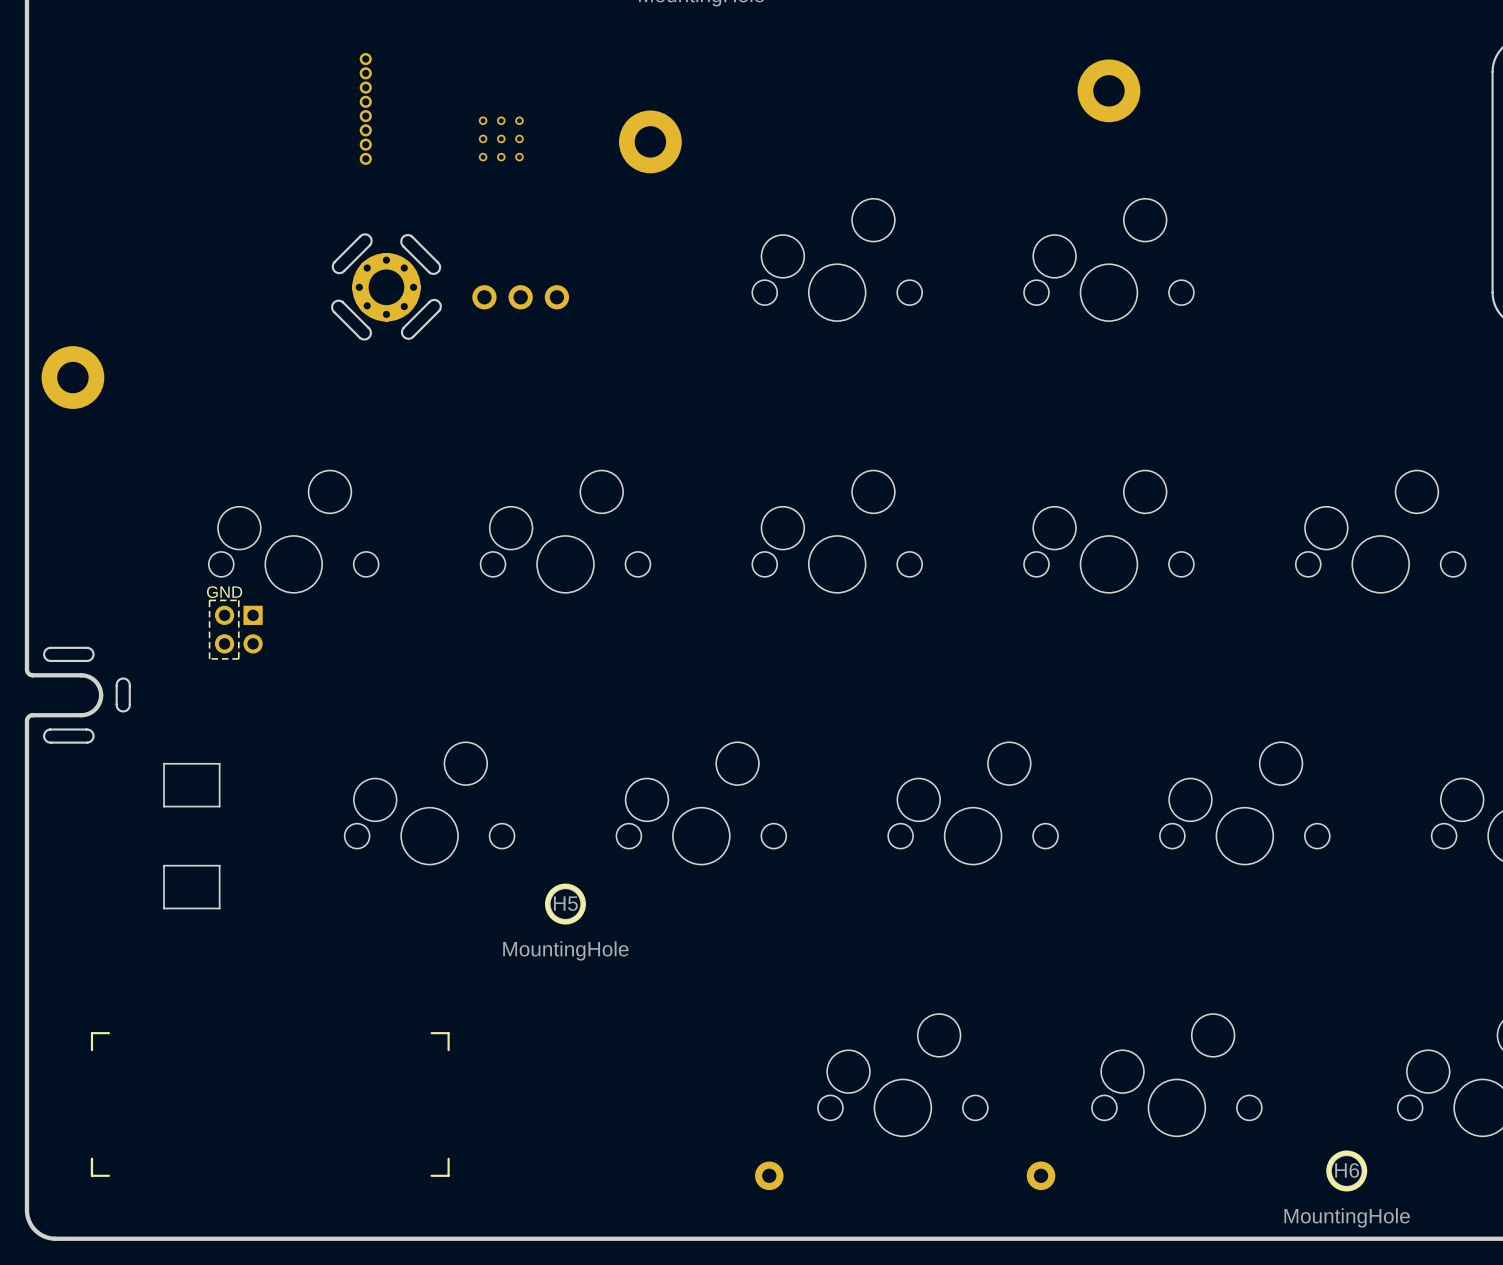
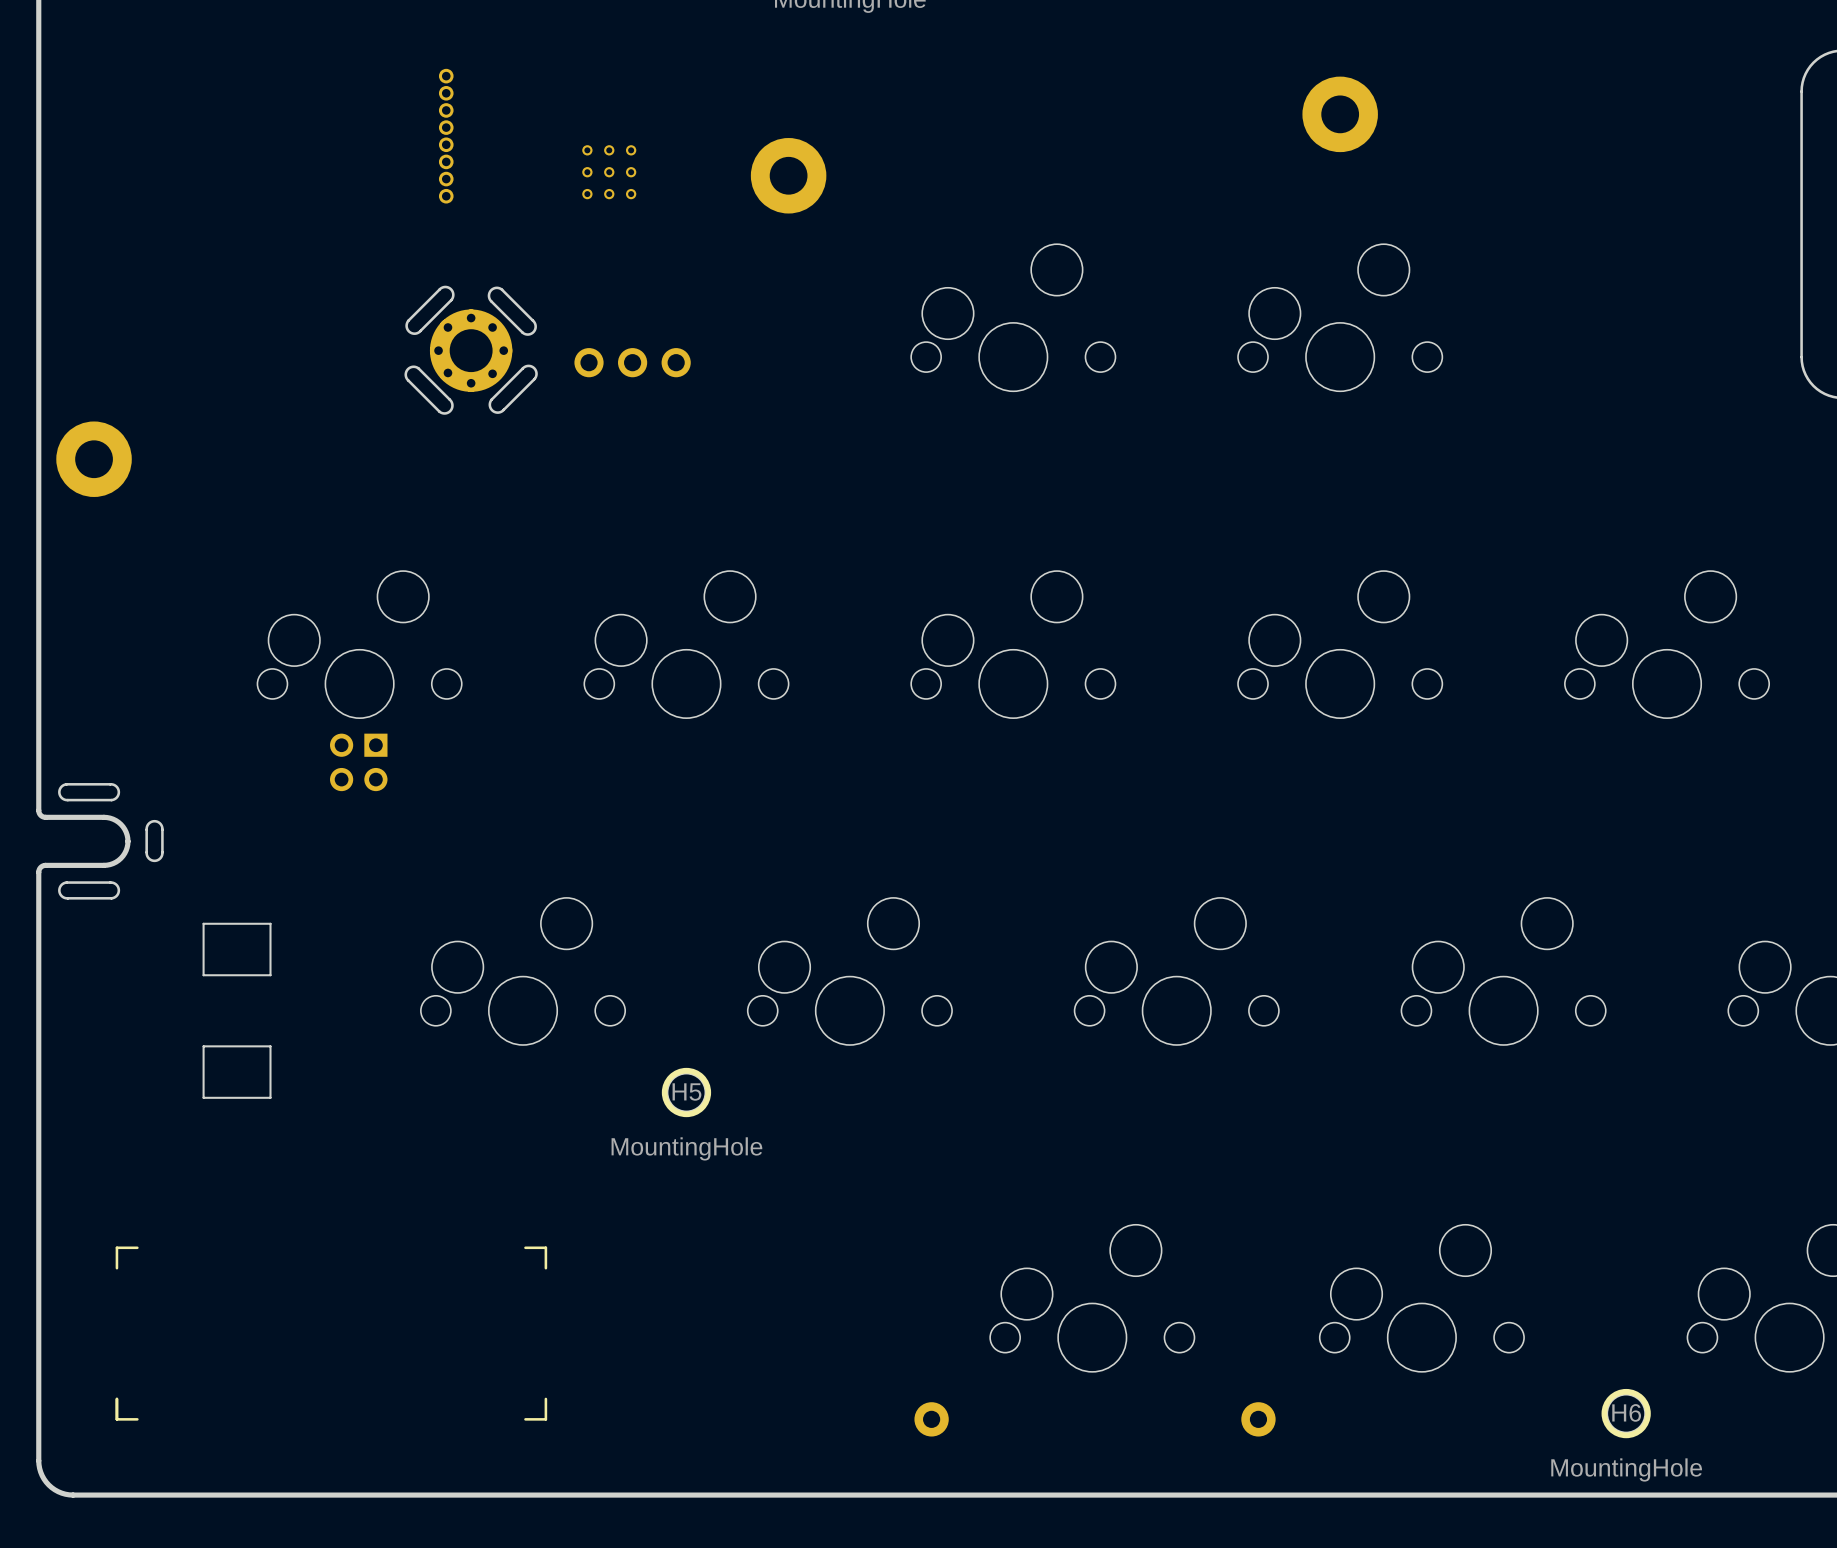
line: (209, 600) (238, 600) (238, 658) (209, 658) (209, 600) -> none
part: (238, 629) -> none
part: none -> (358, 762)

